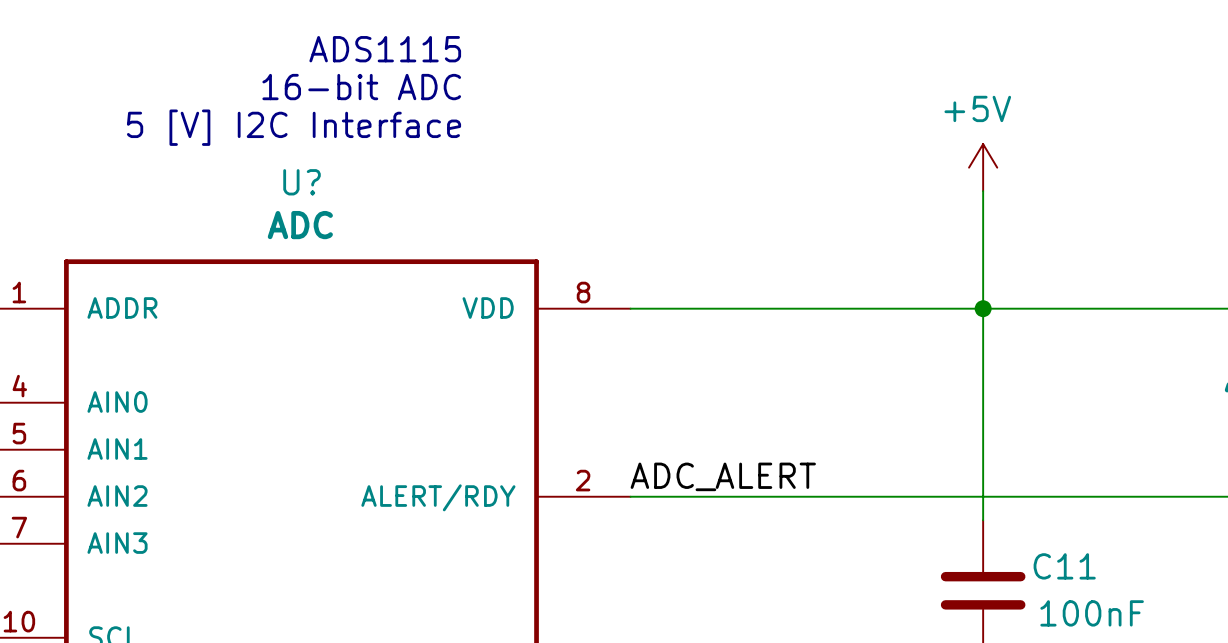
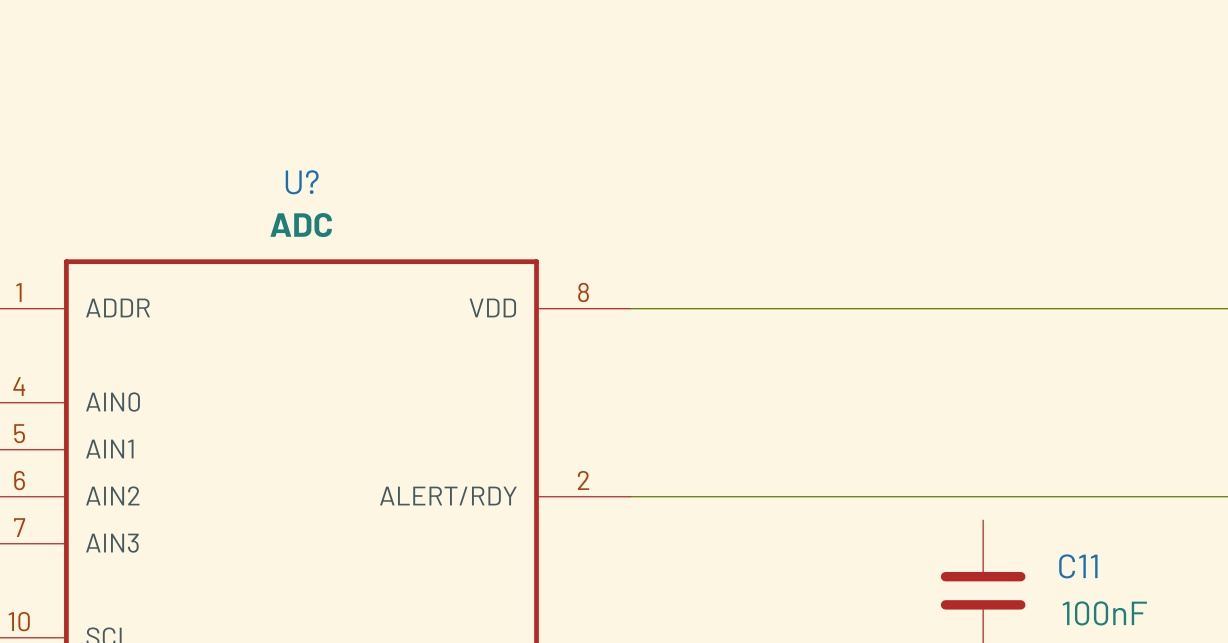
text: ADS1115 (385, 49) -> none
text: 16-bit ADC (361, 87) -> none
text: 5 [V] I2C Interface (294, 127) -> none
power symbol: +5V (983, 167) -> none
wire: (983, 191) (983, 520) -> none
junction: (983, 308) -> none
label: ADC_ALERT (723, 476) -> none

